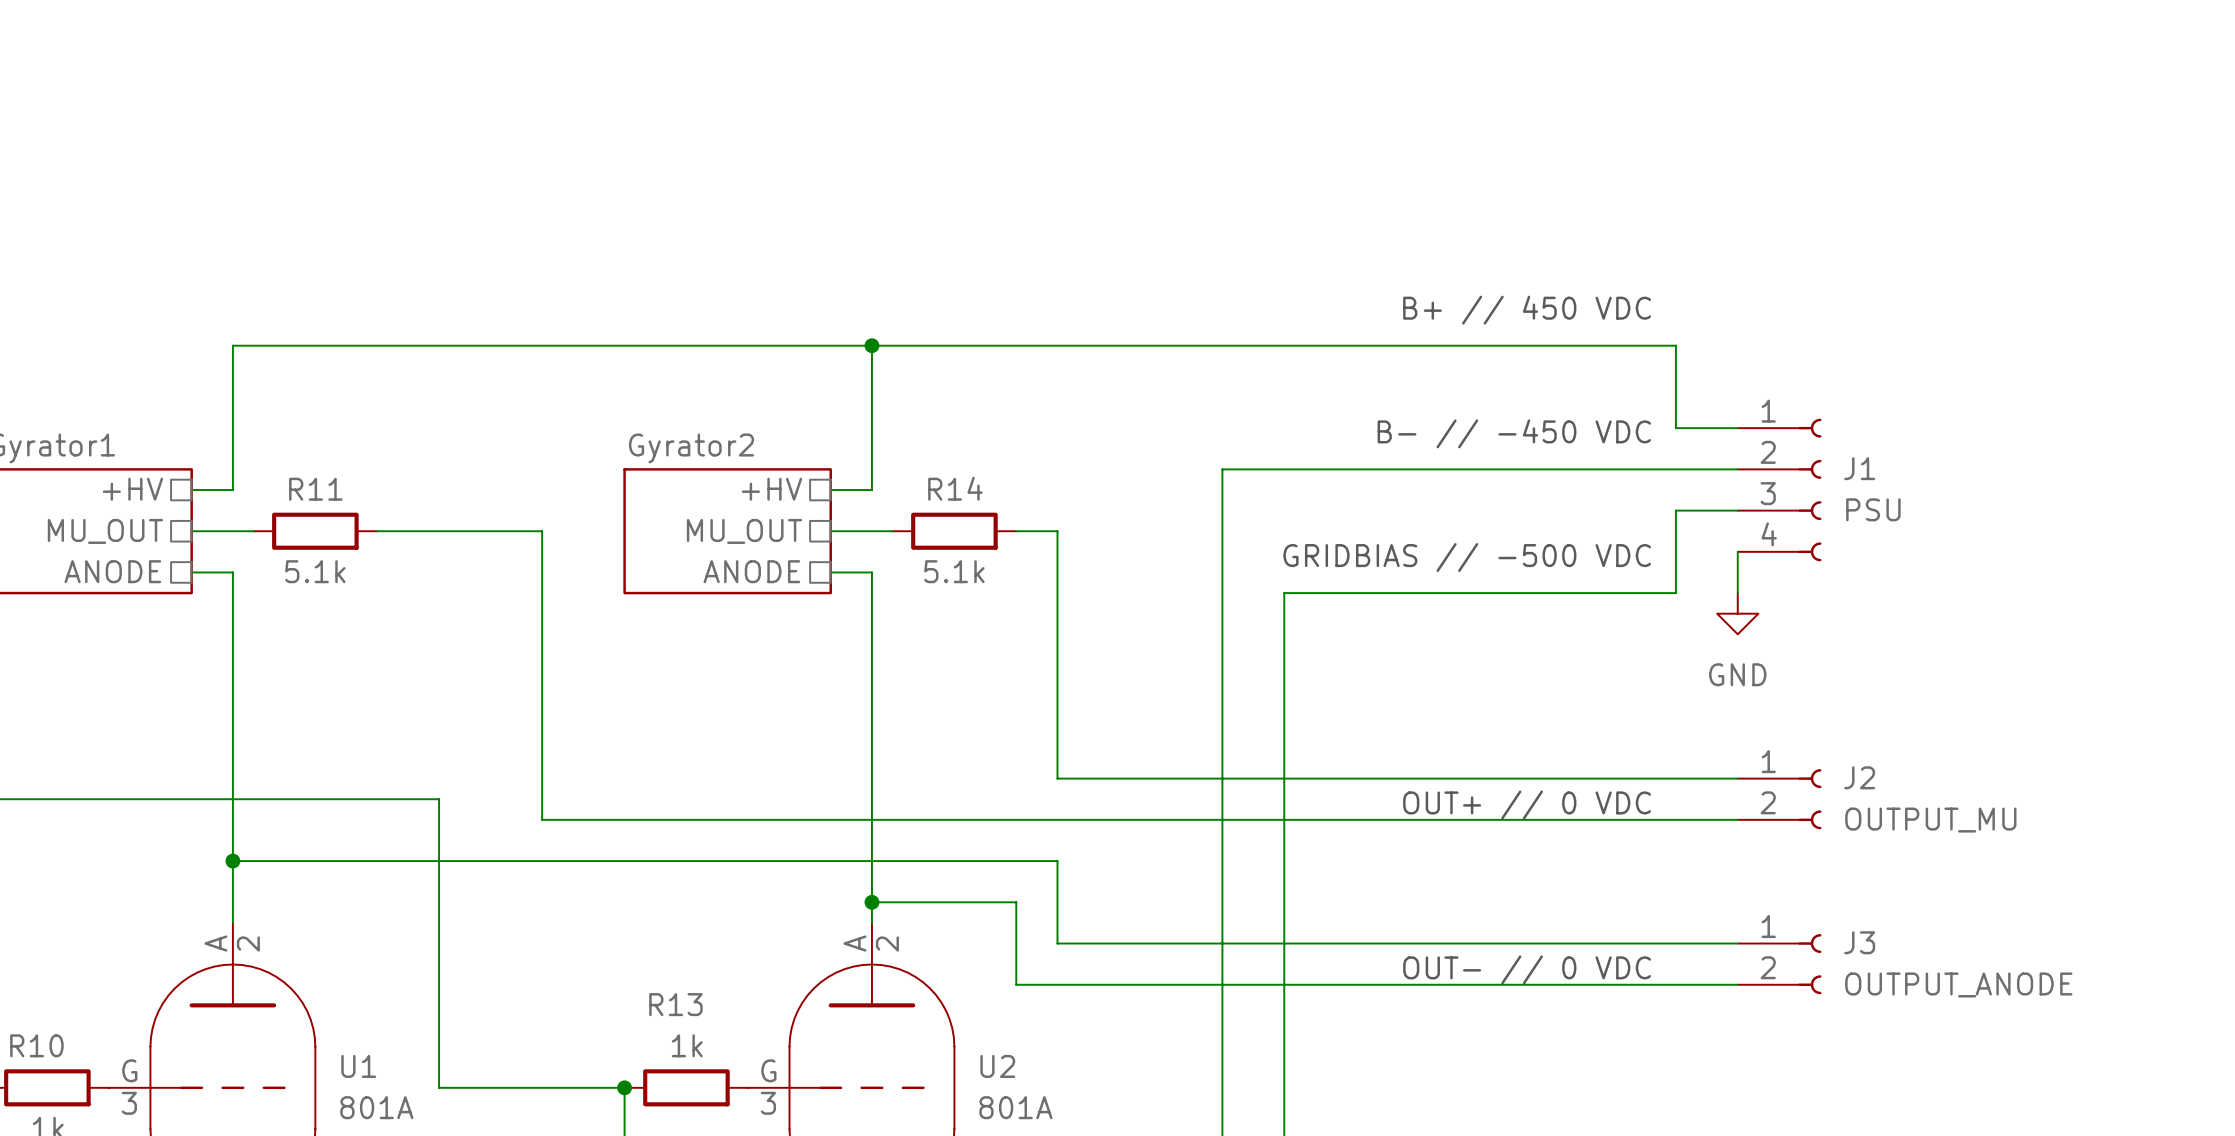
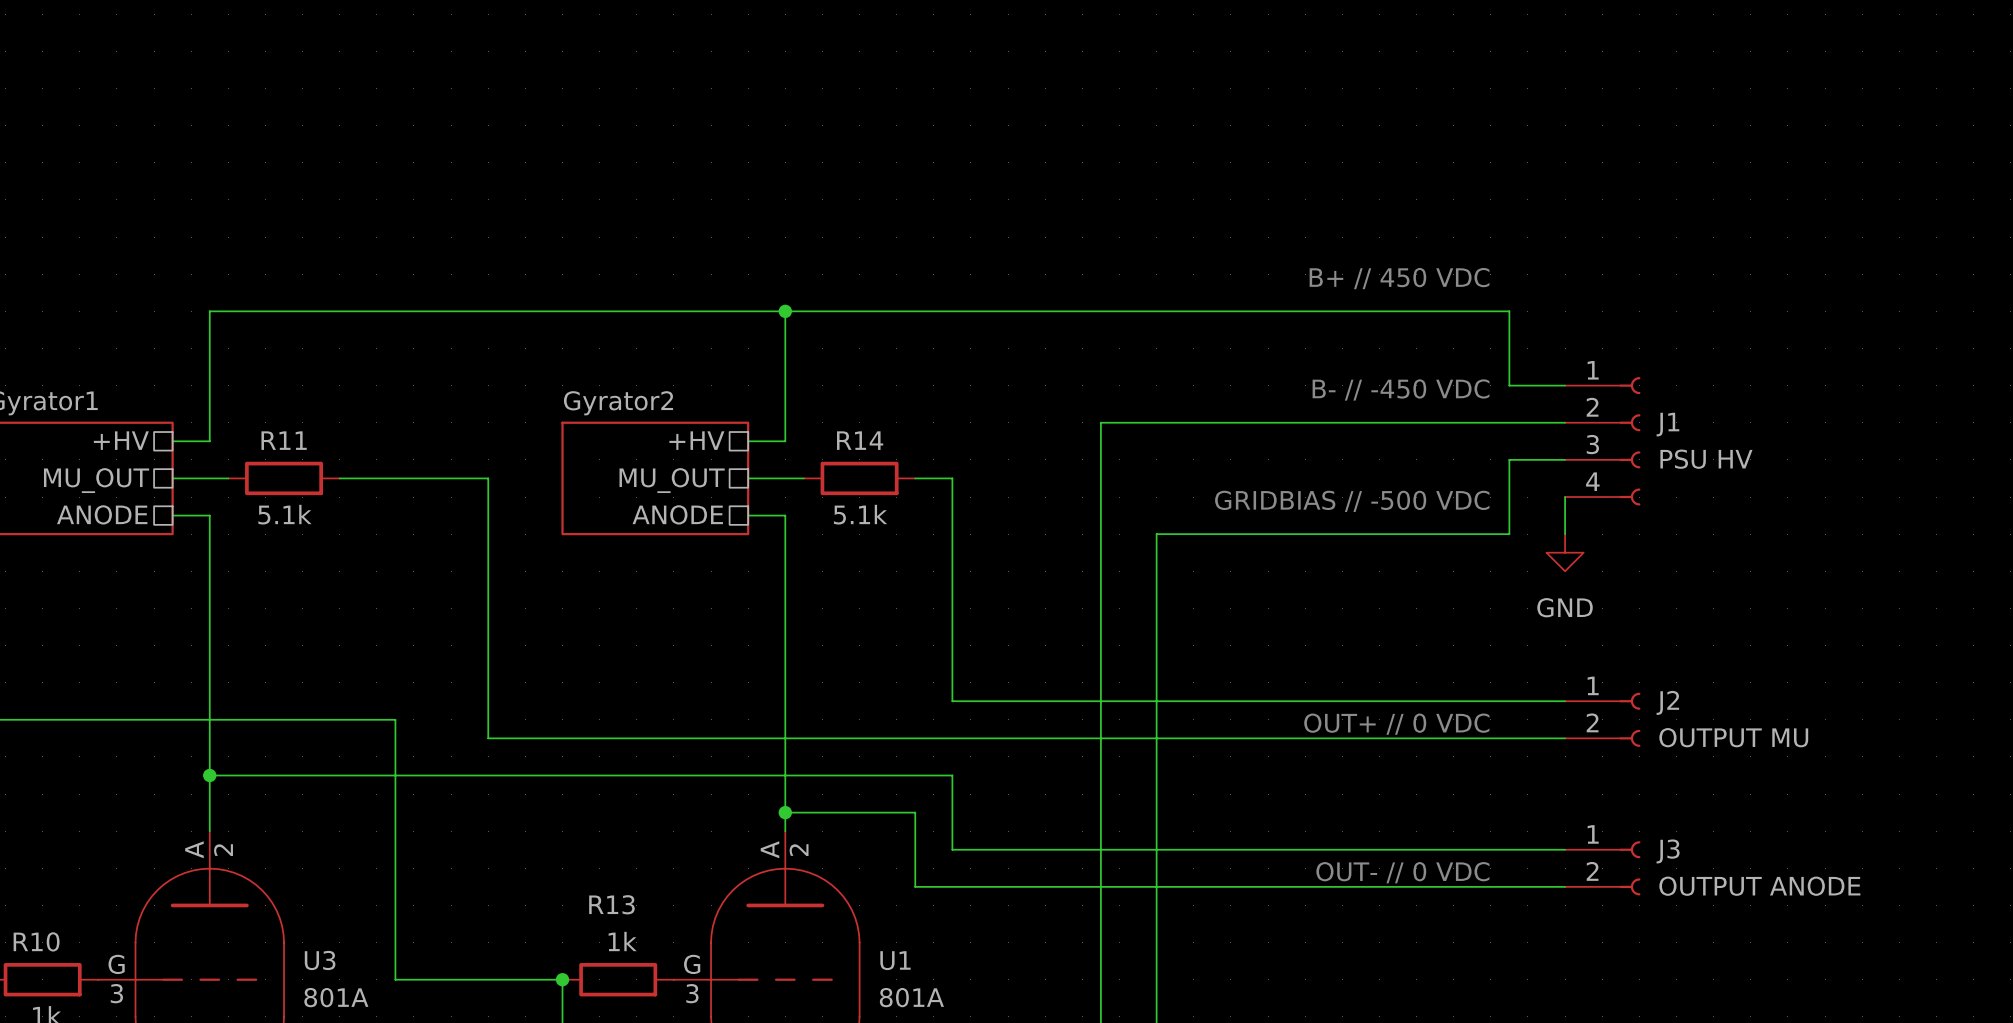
J1 value: PSU (1873, 509) -> PSU HV (1706, 459)
J2 value: OUTPUT_MU (1930, 820) -> OUTPUT MU (1733, 737)
J3 value: OUTPUT_ANODE (1958, 984) -> OUTPUT ANODE (1759, 886)
U1 name: U1 (358, 1066) -> U3 (320, 960)
U2 name: U2 (997, 1066) -> U1 (895, 960)

